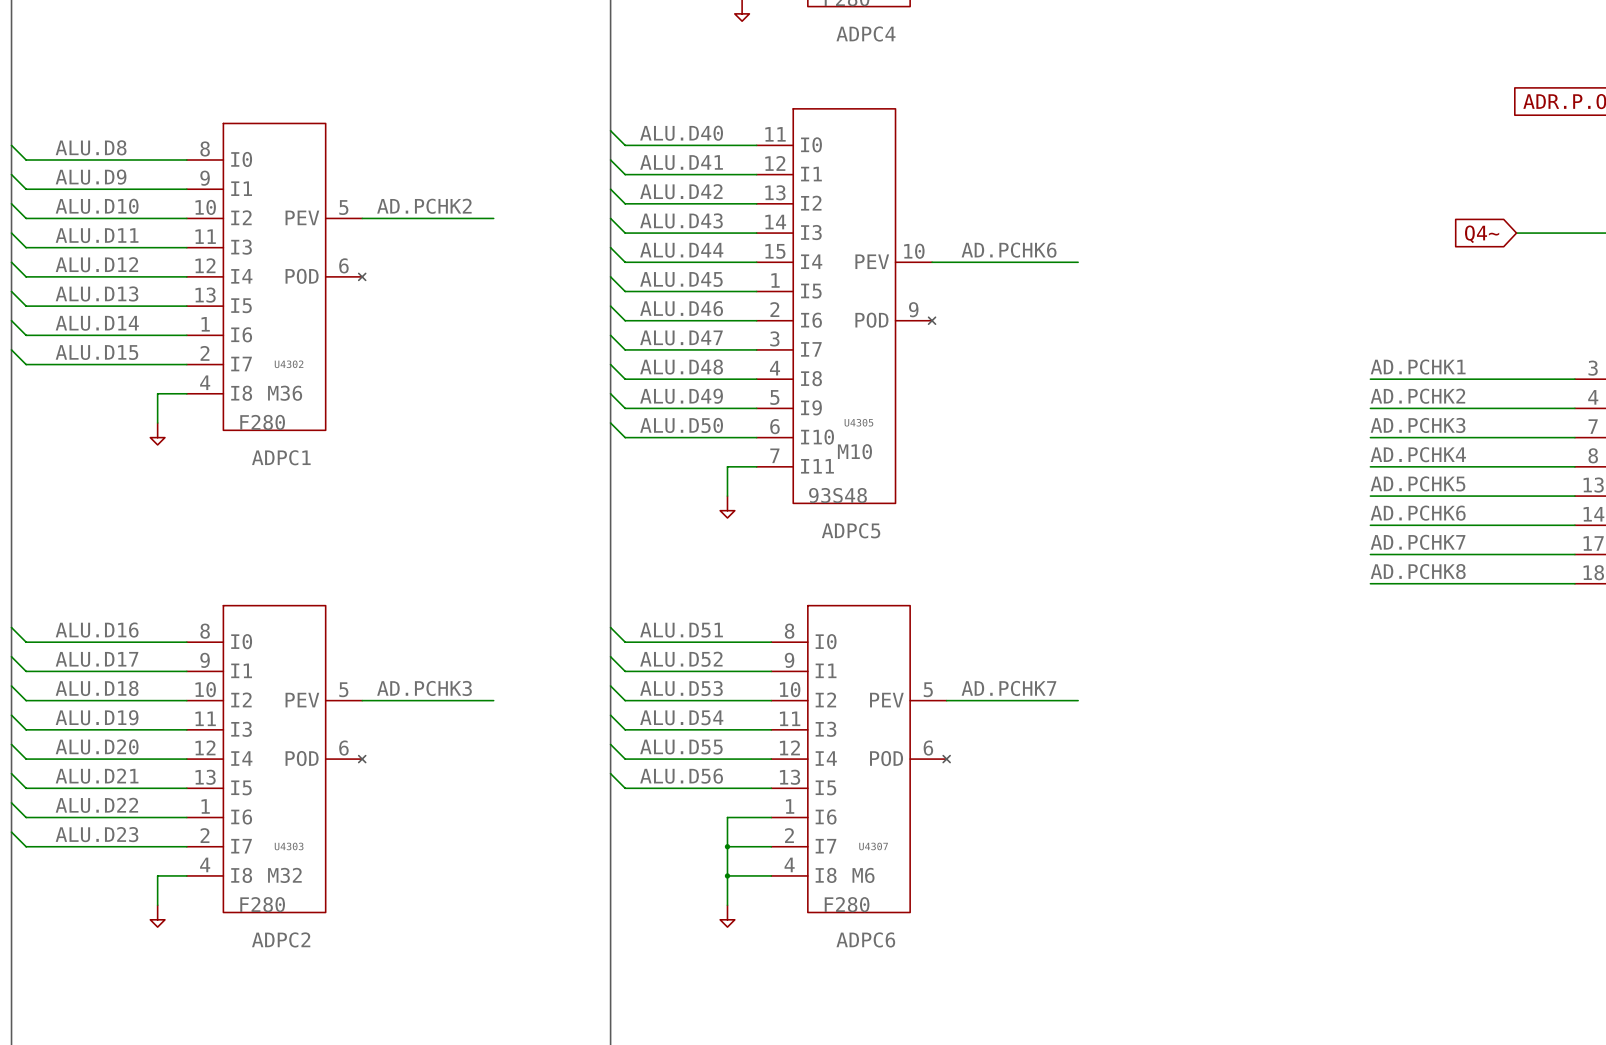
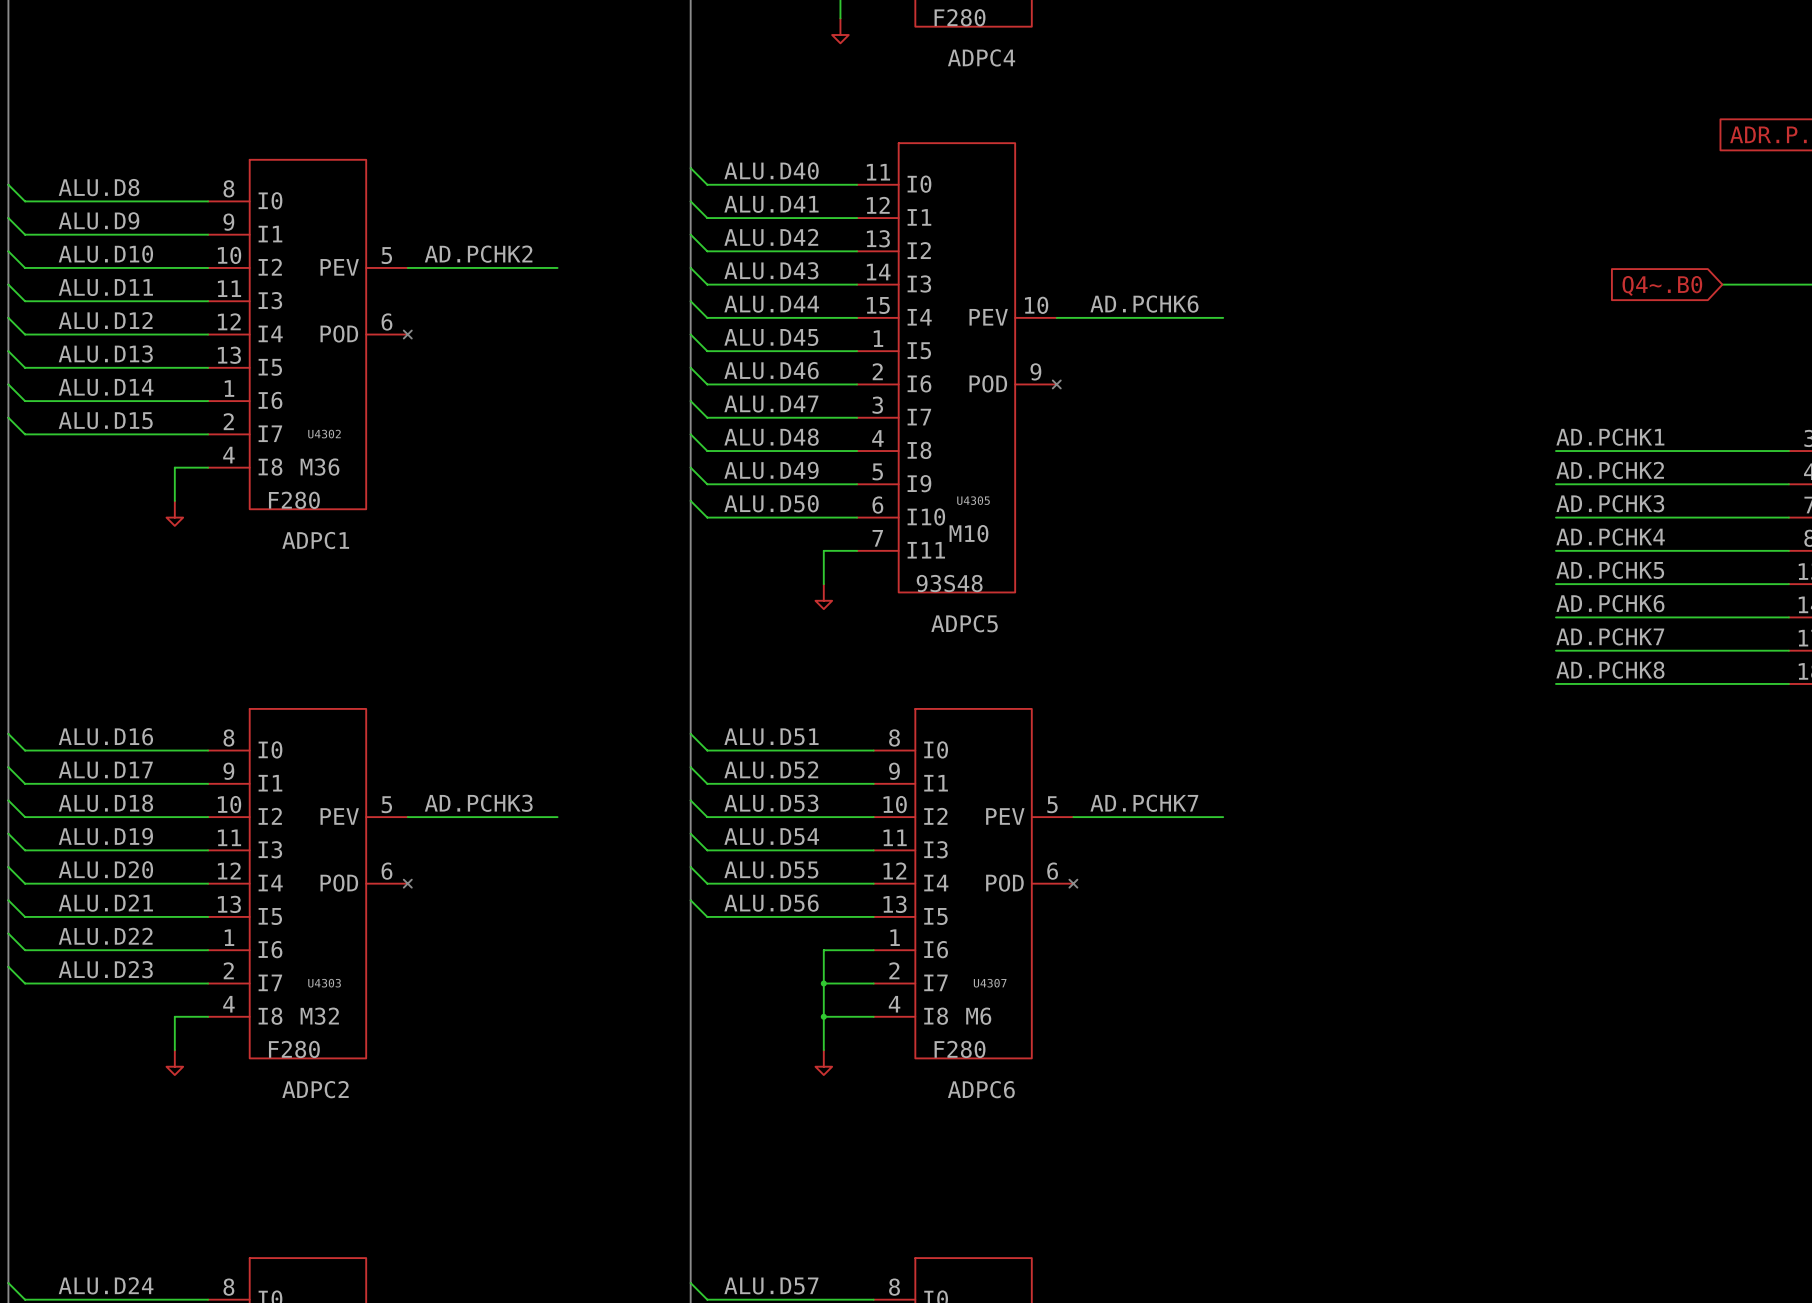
global label: Q4~ (1482, 234) -> Q4~.B0 (1662, 285)

